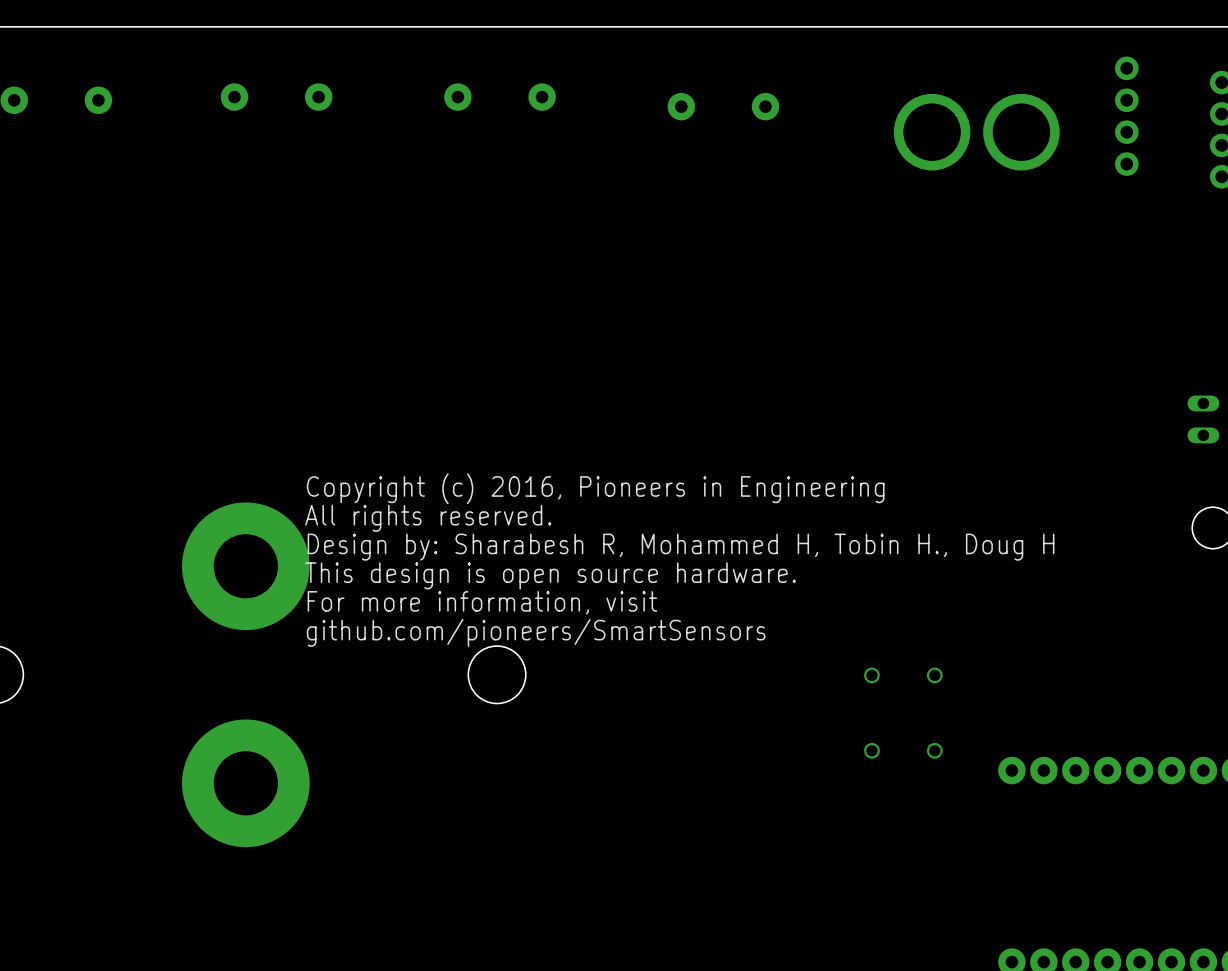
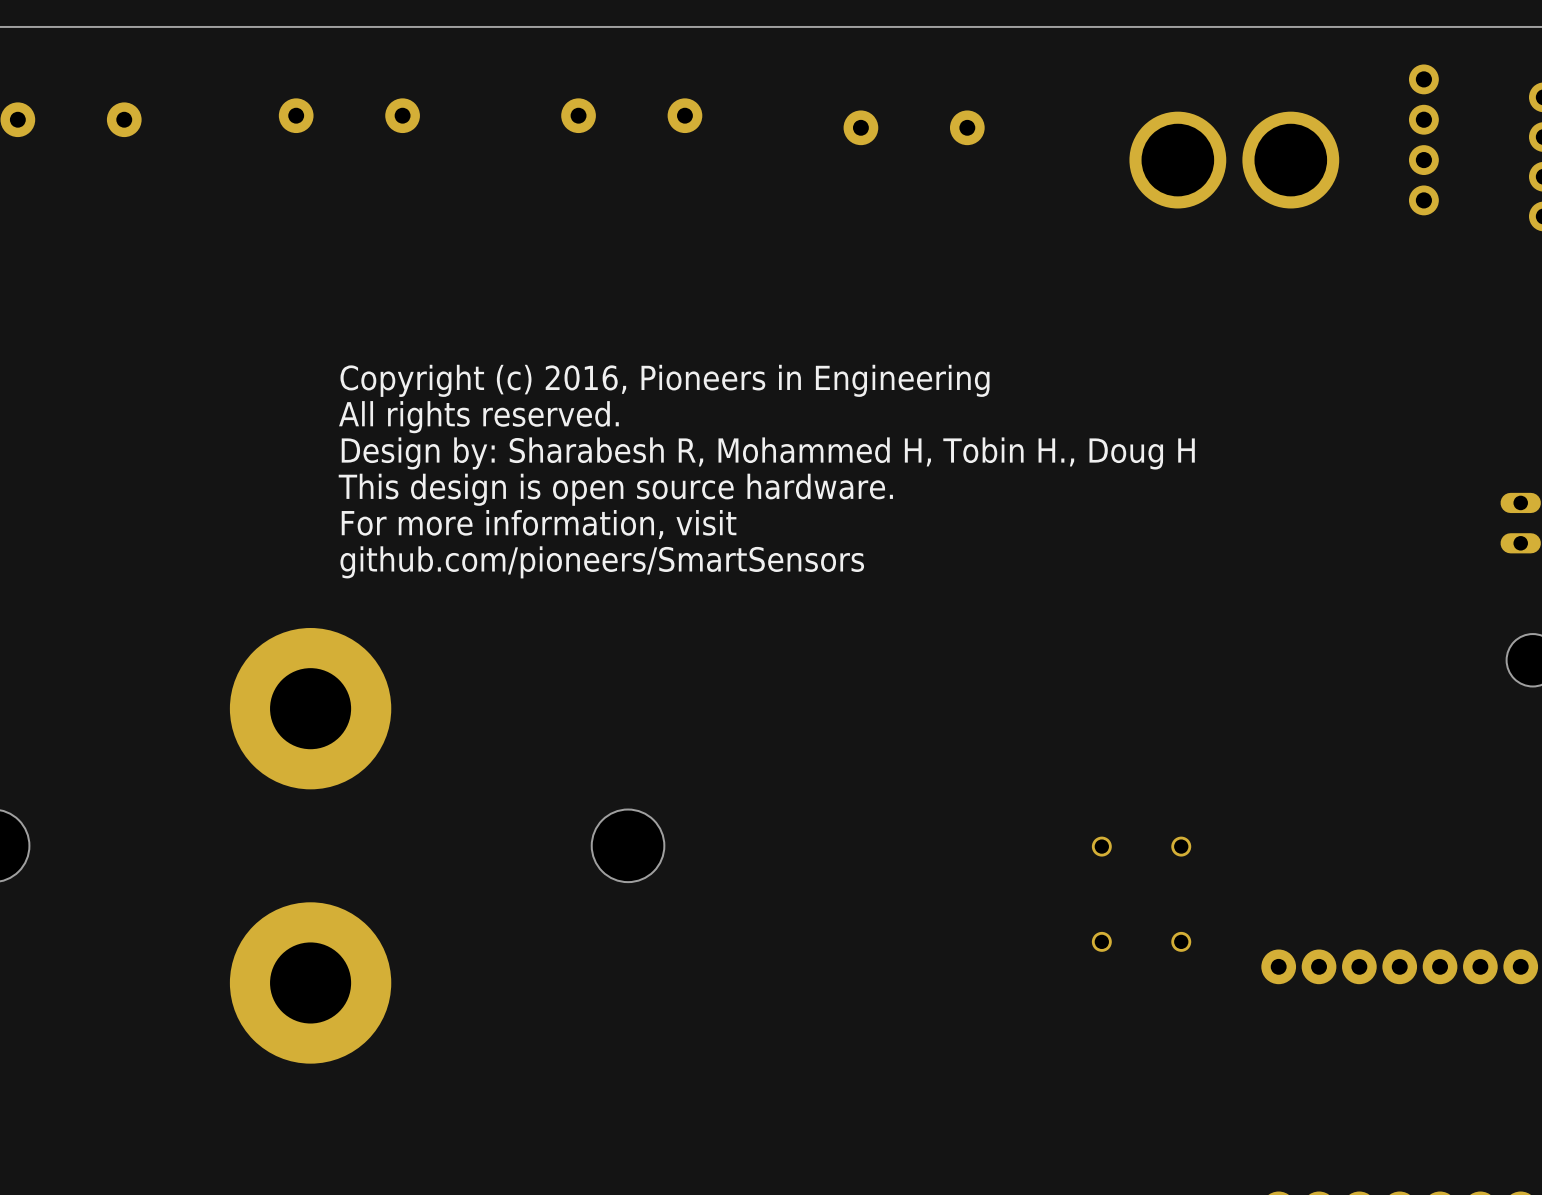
text position: Copyright (c) 2016, Pioneers in Engineering (595, 488) -> Copyright (c) 2016, Pioneers in Engineering (664, 380)
text position: All rights reserved. (428, 518) -> All rights reserved. (478, 417)
text position: Design by: Sharabesh R, Mohammed H, Tobin H., Doug H (681, 547) -> Design by: Sharabesh R, Mohammed H, Tobin H., Doug H (768, 453)
text position: This design is open source hardware. (550, 575) -> This design is open source hardware. (615, 489)
text position: For more information, visit (482, 602) -> For more information, visit (539, 524)
text position: github.com/pioneers/SmartSensors (536, 632) -> github.com/pioneers/SmartSensors (602, 562)

